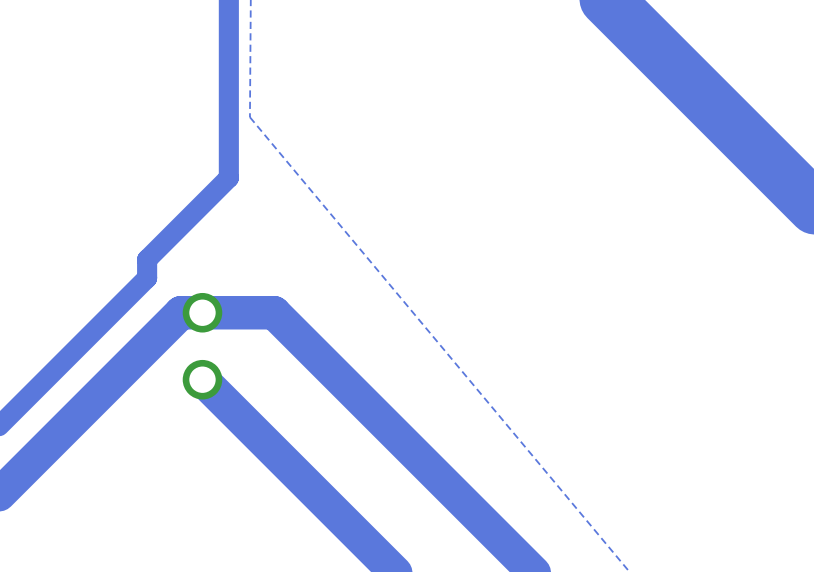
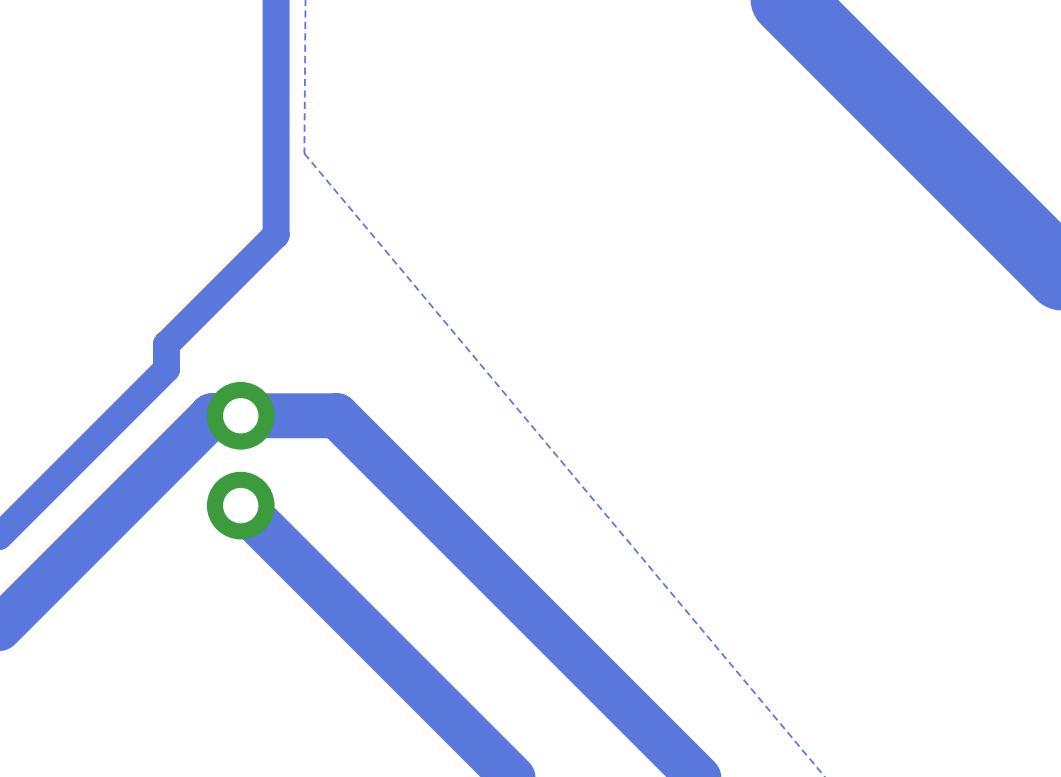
part footprint: [182, 292, 223, 400] -> [206, 381, 275, 540]

